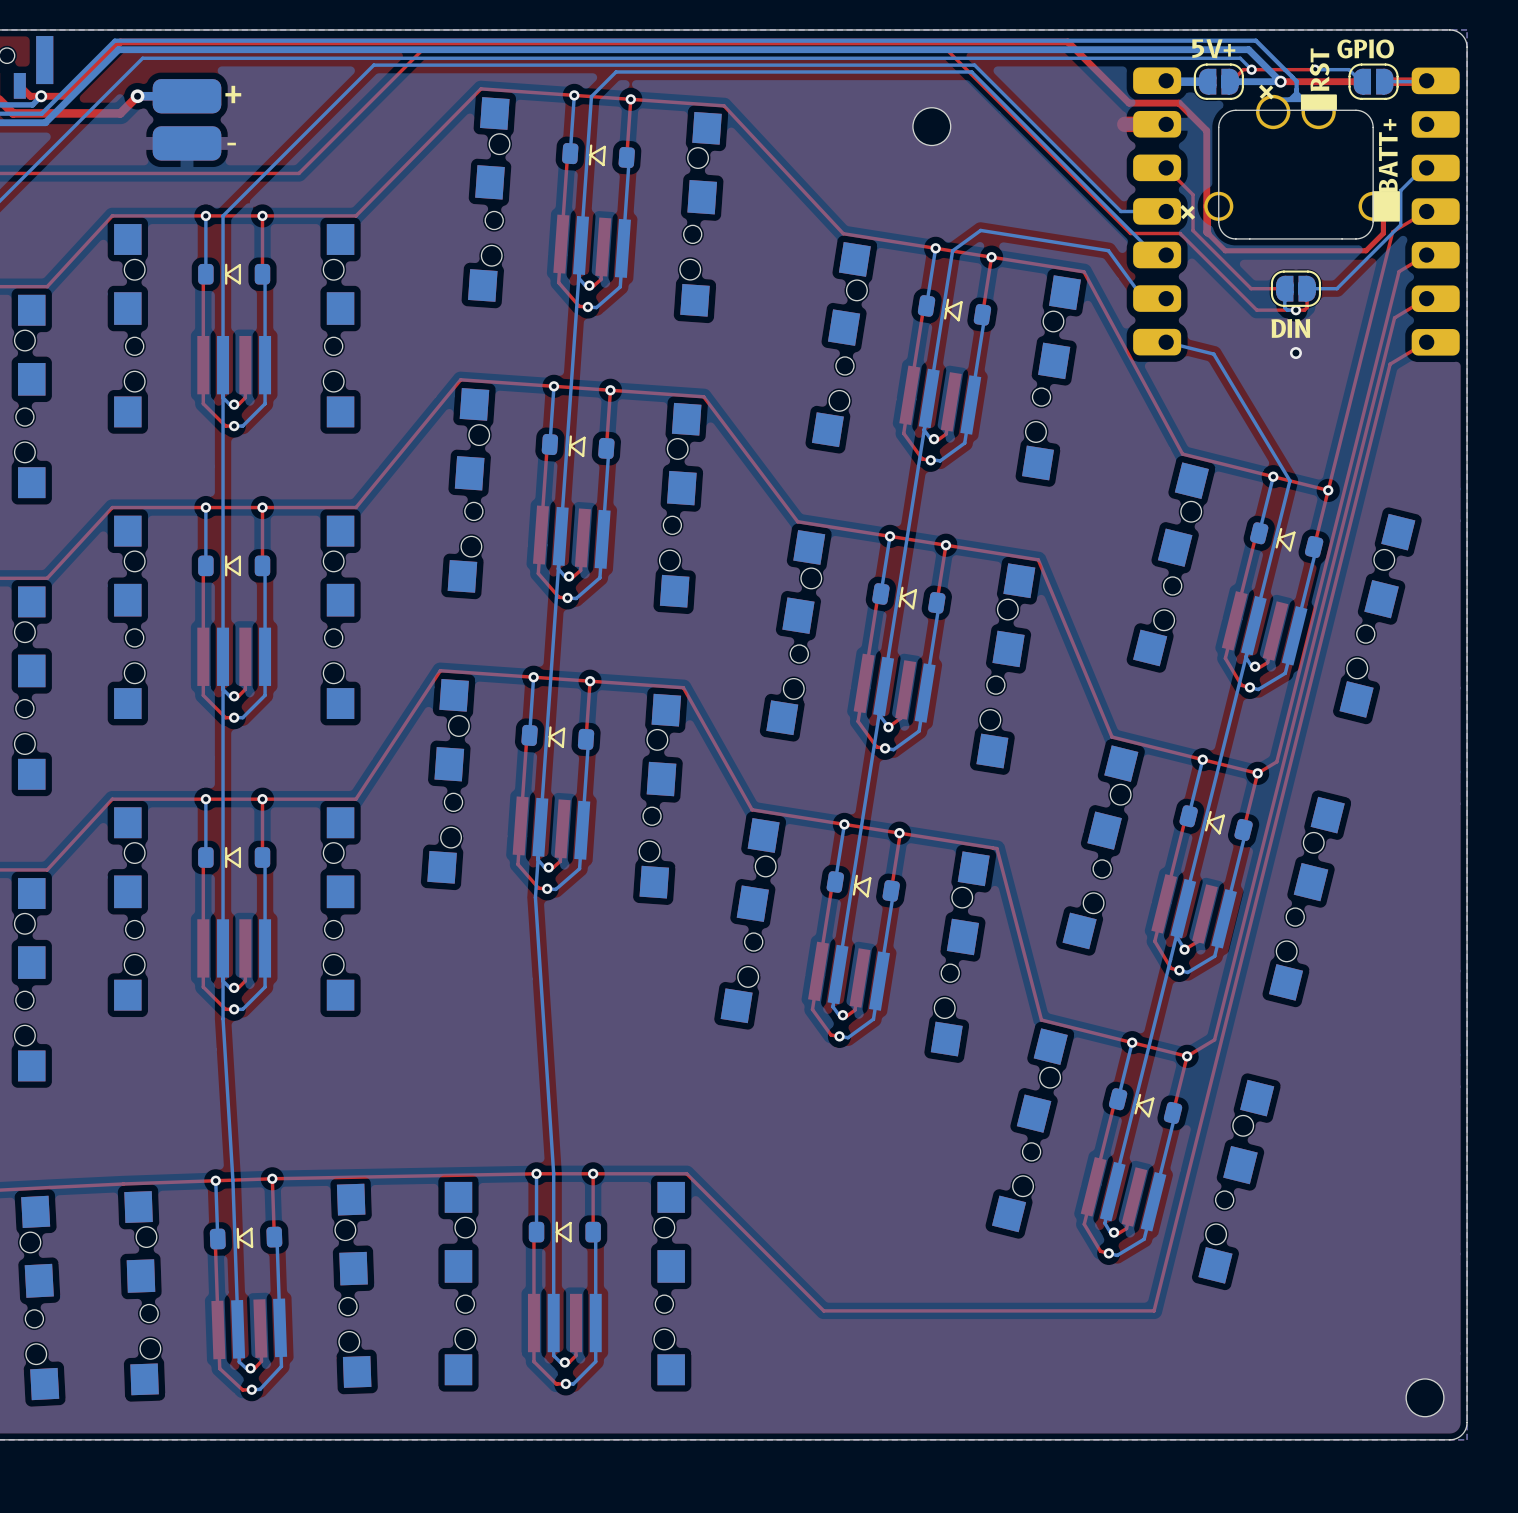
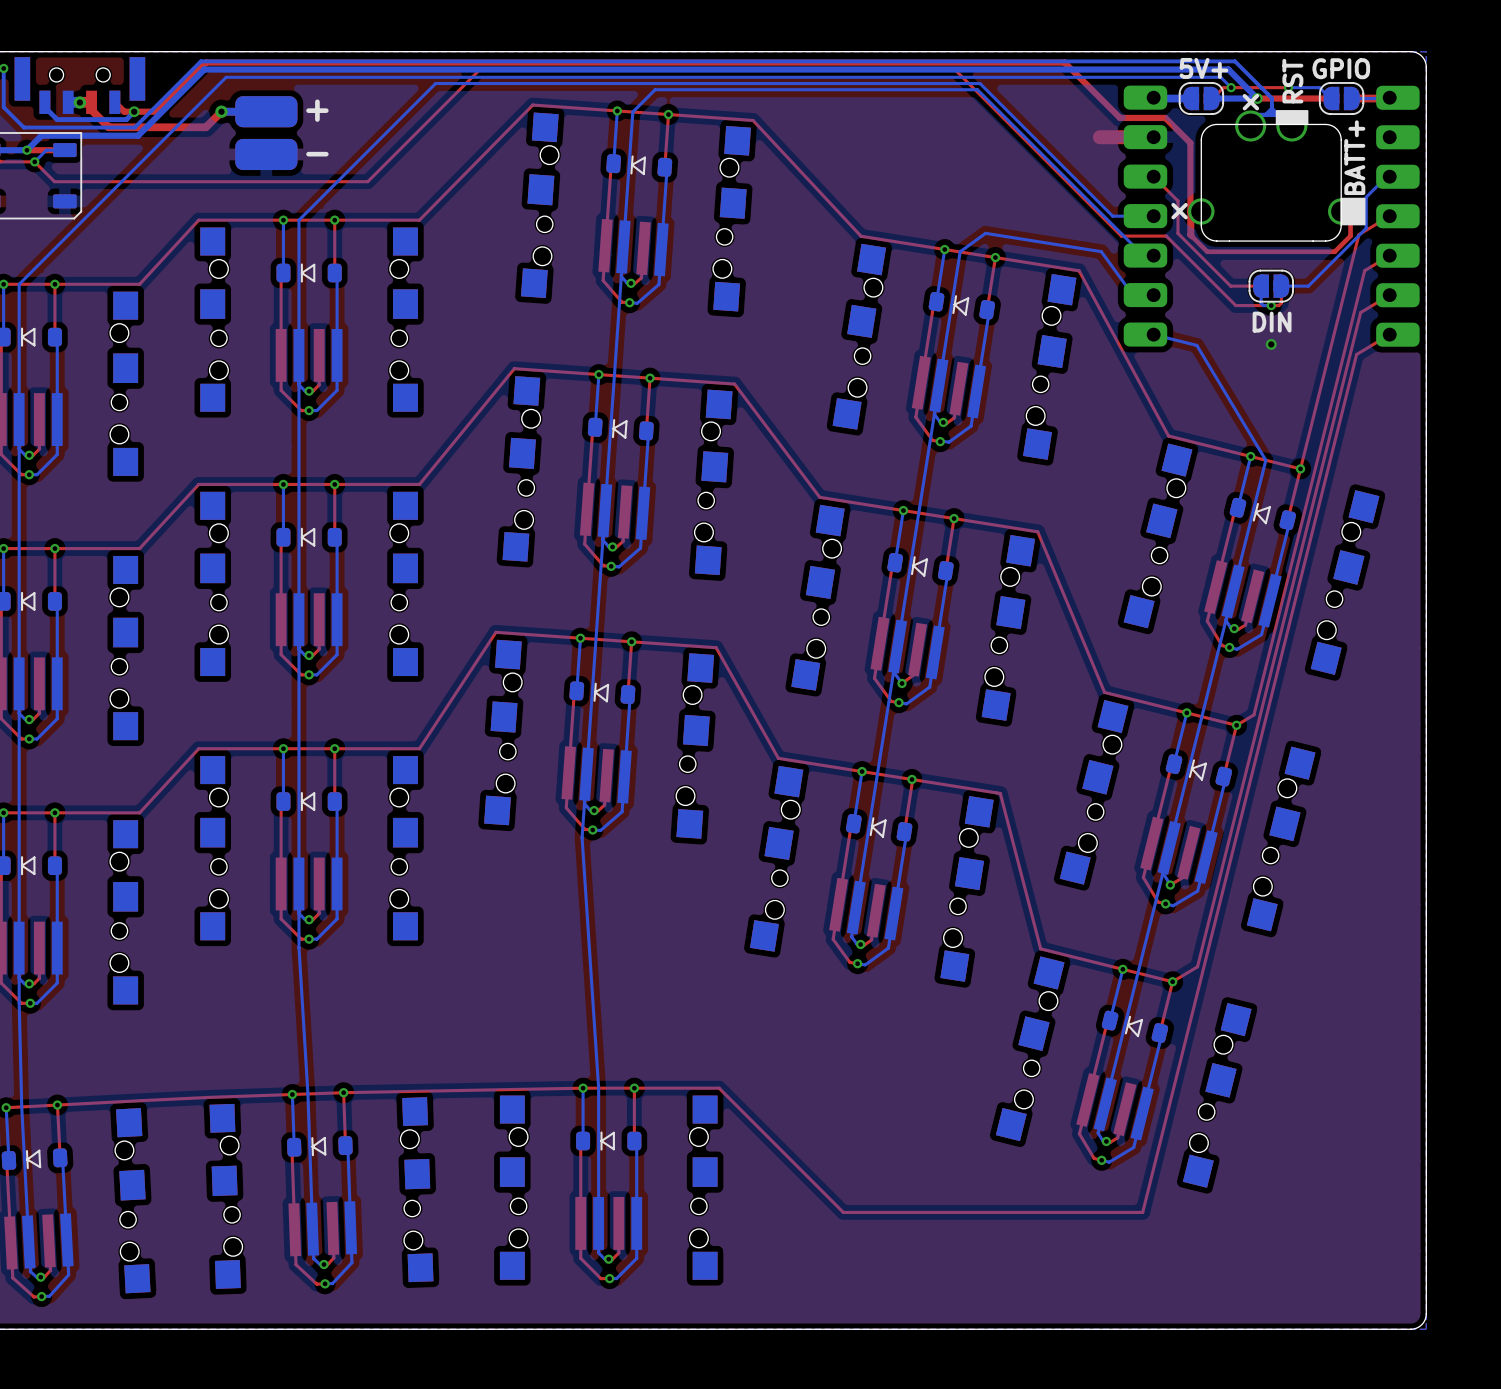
top track: none -> (1116, 137) (1099, 137)
part: (931, 126) -> none
part: (1425, 1397) -> none

